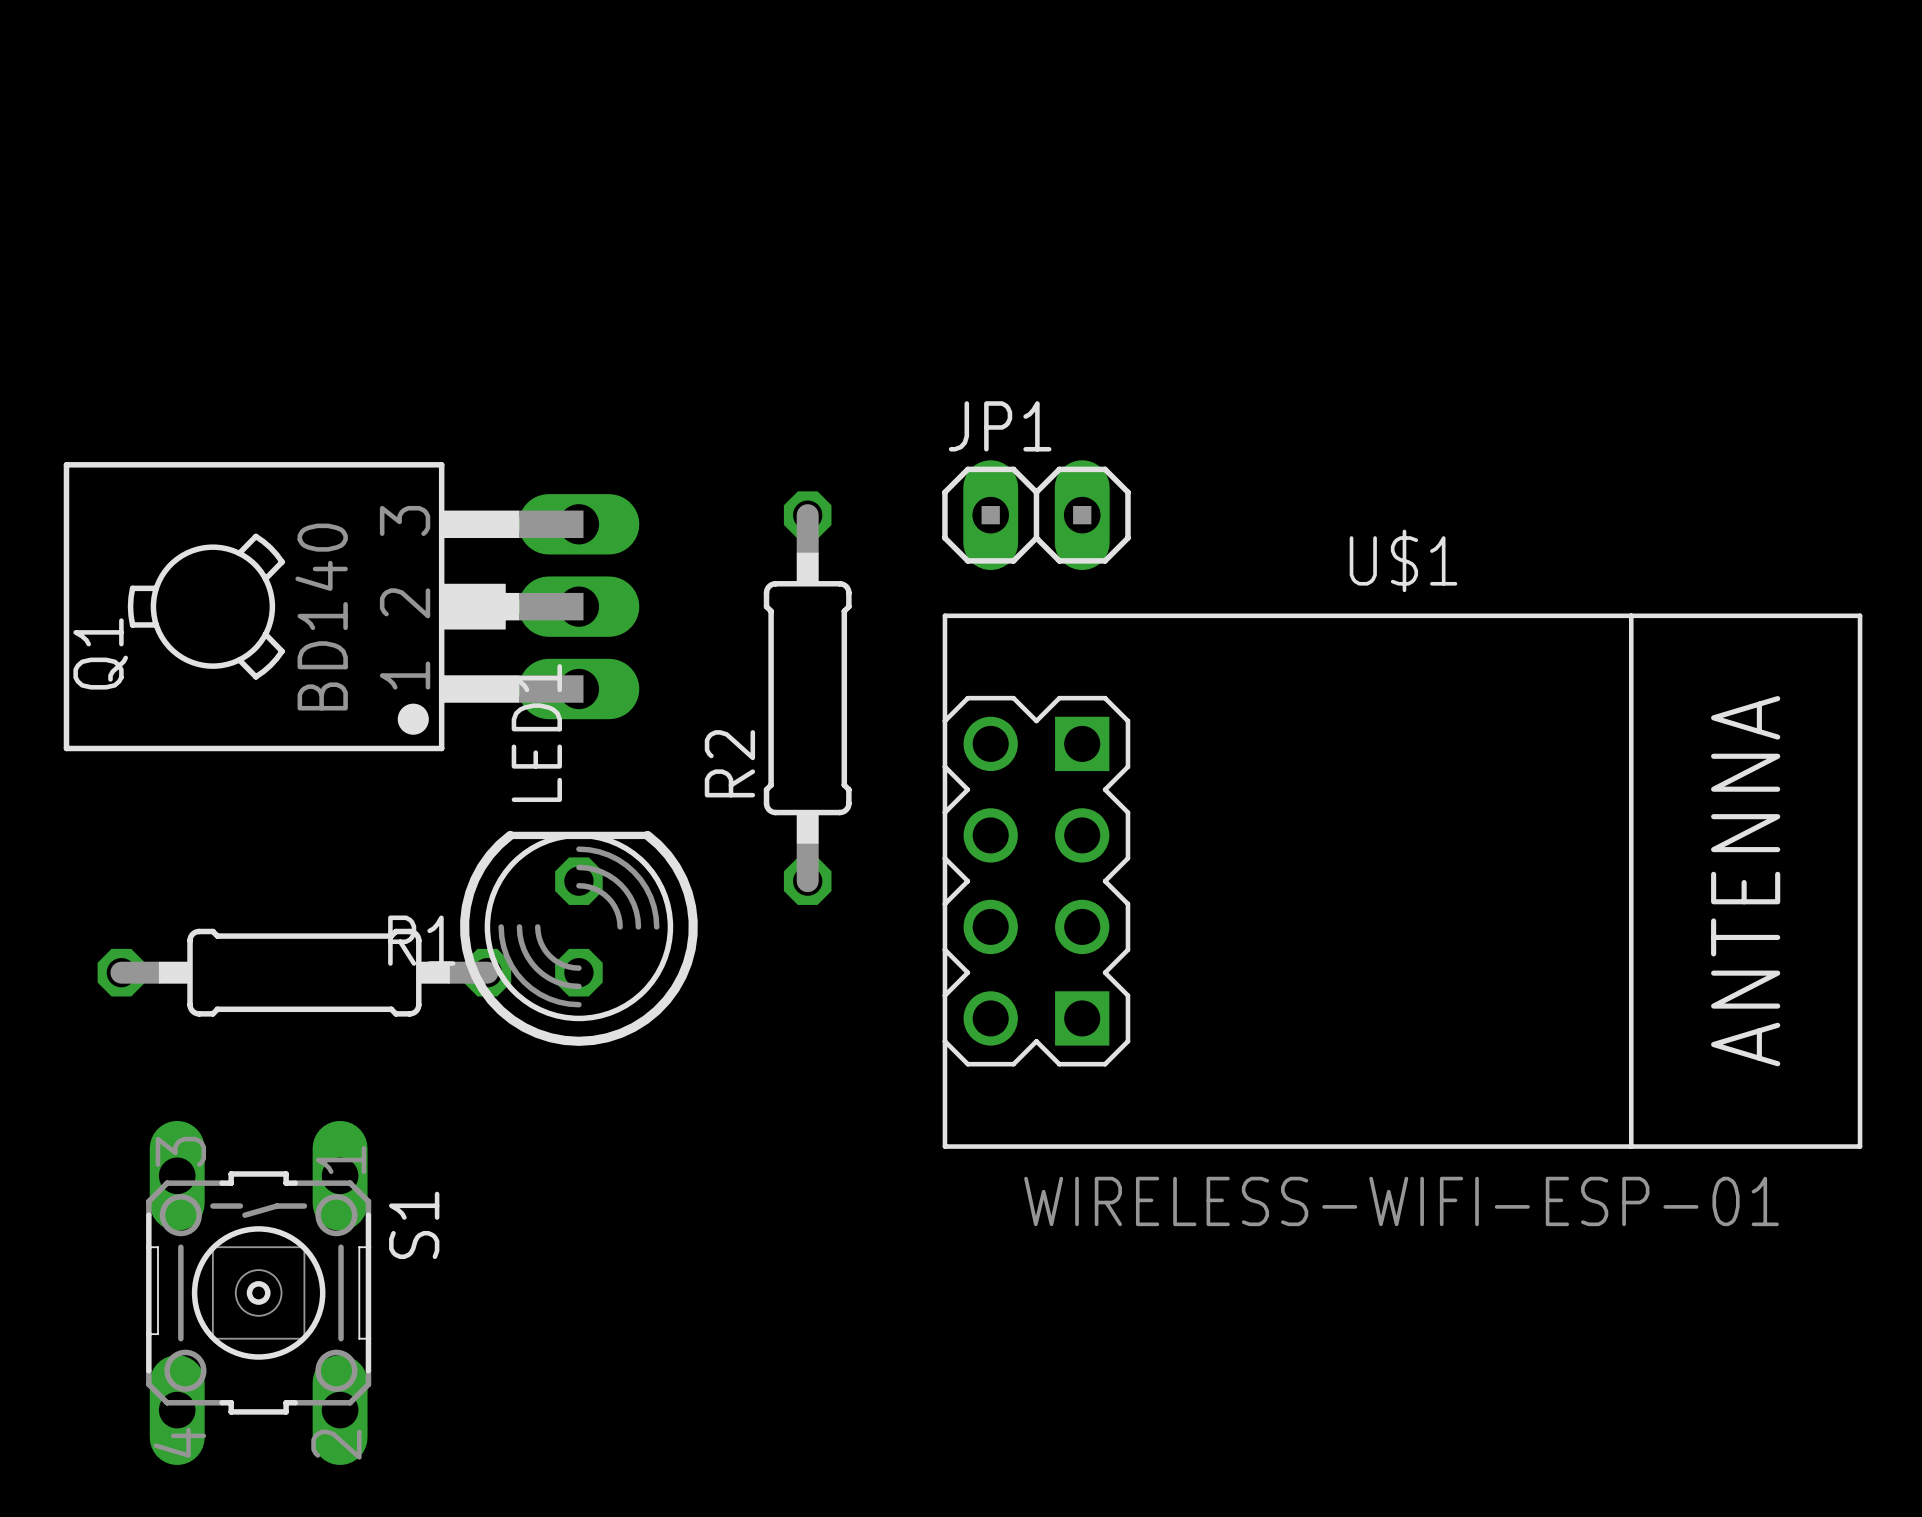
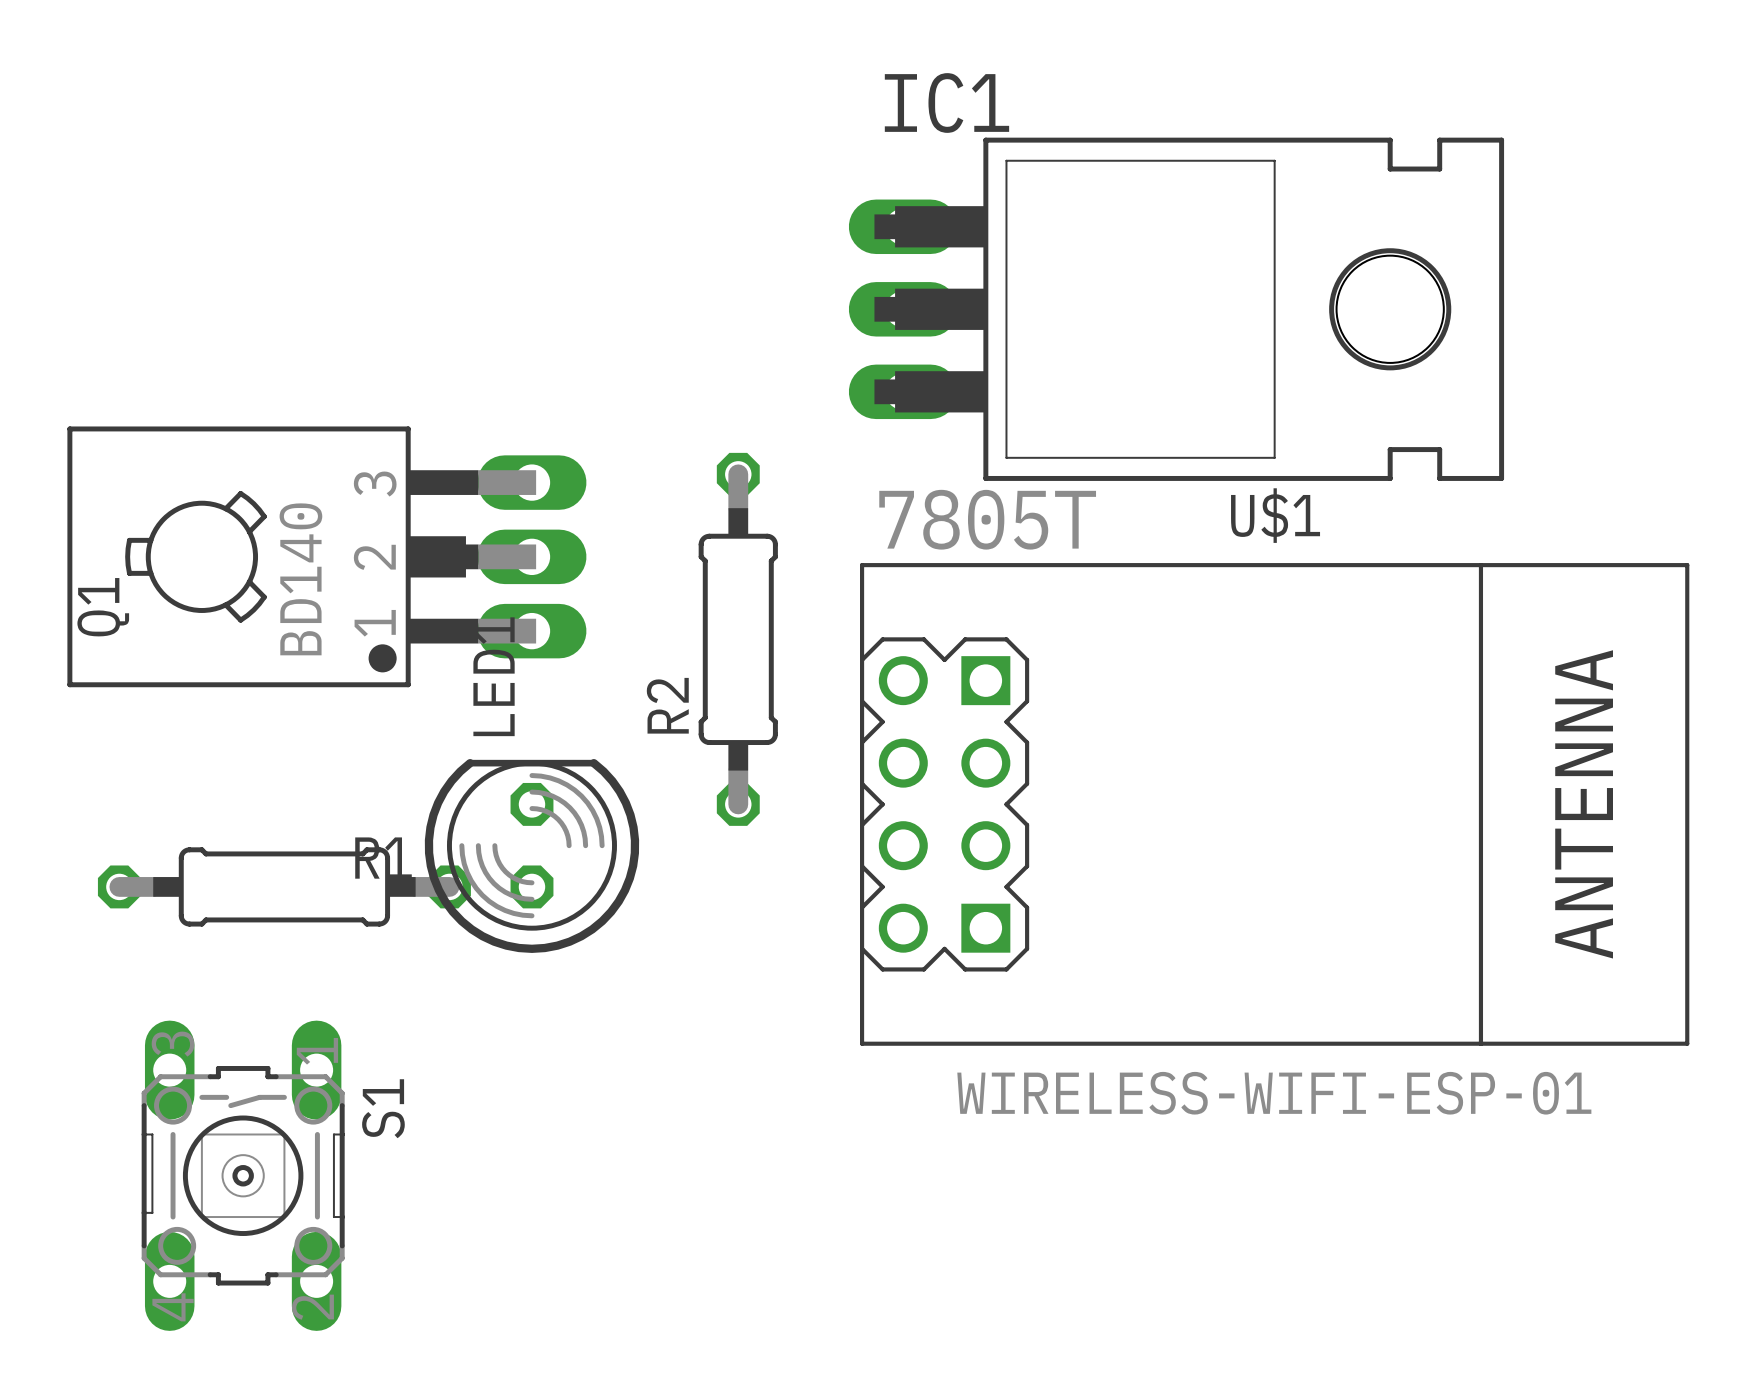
IC1: none -> 7805T (1176, 309)
JP1: (1036, 515) -> none

